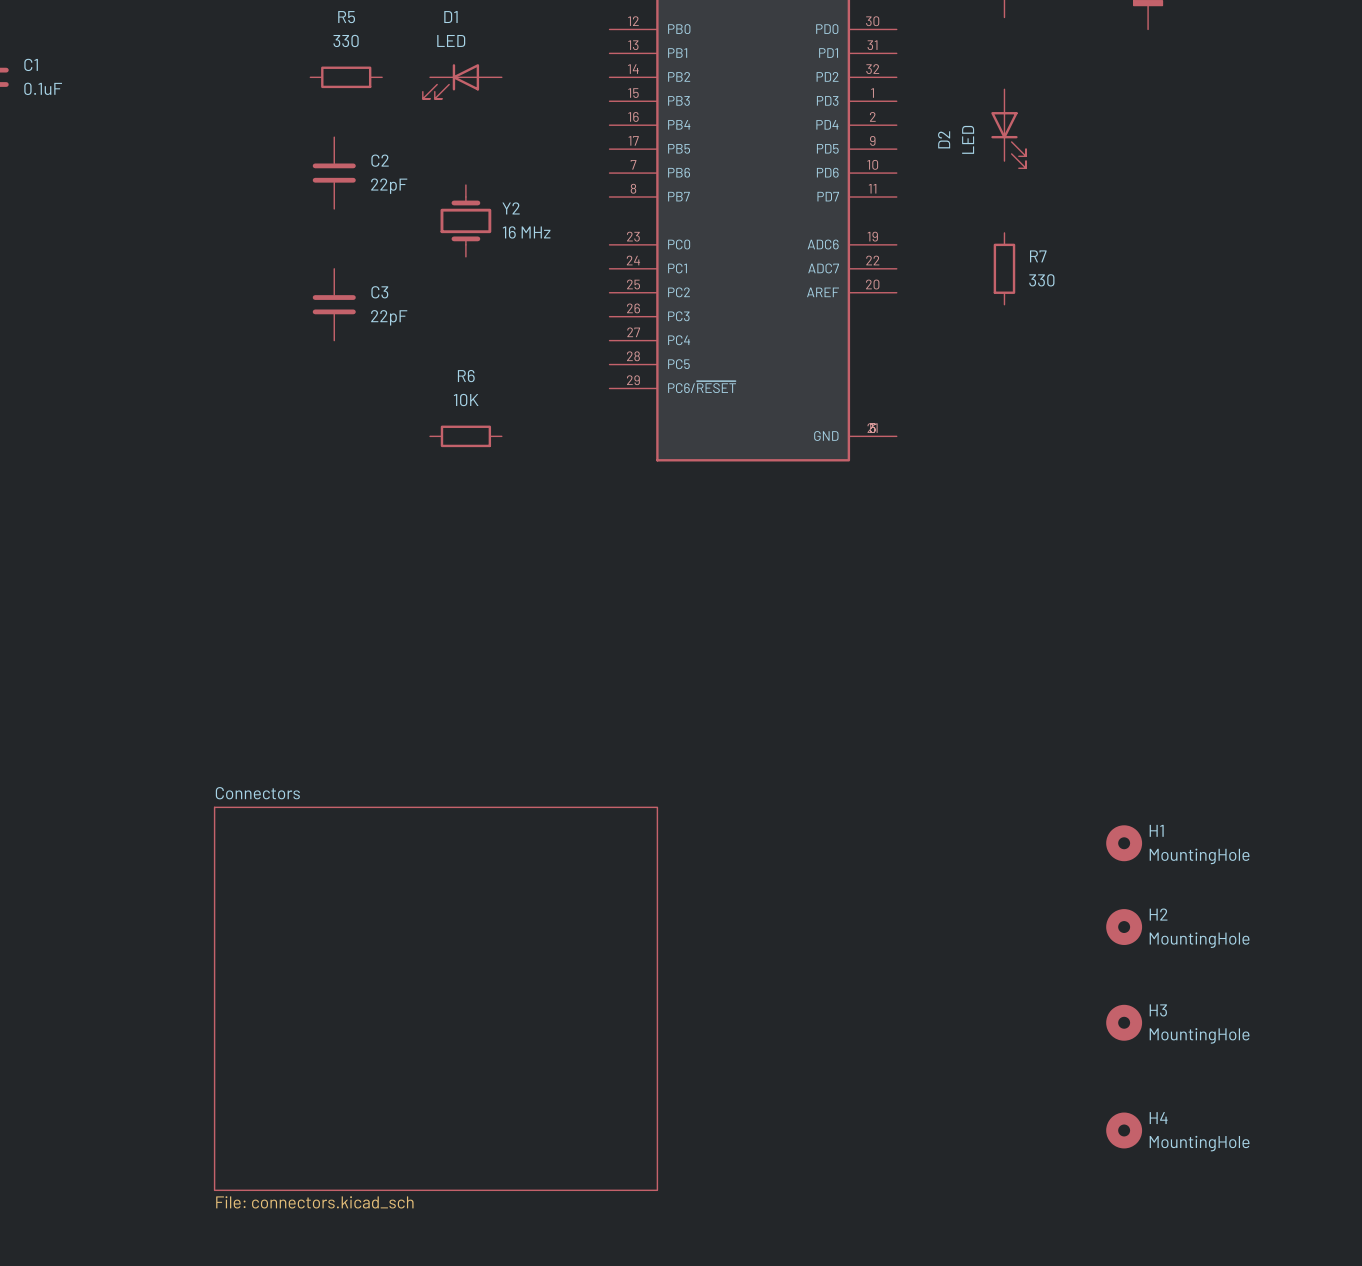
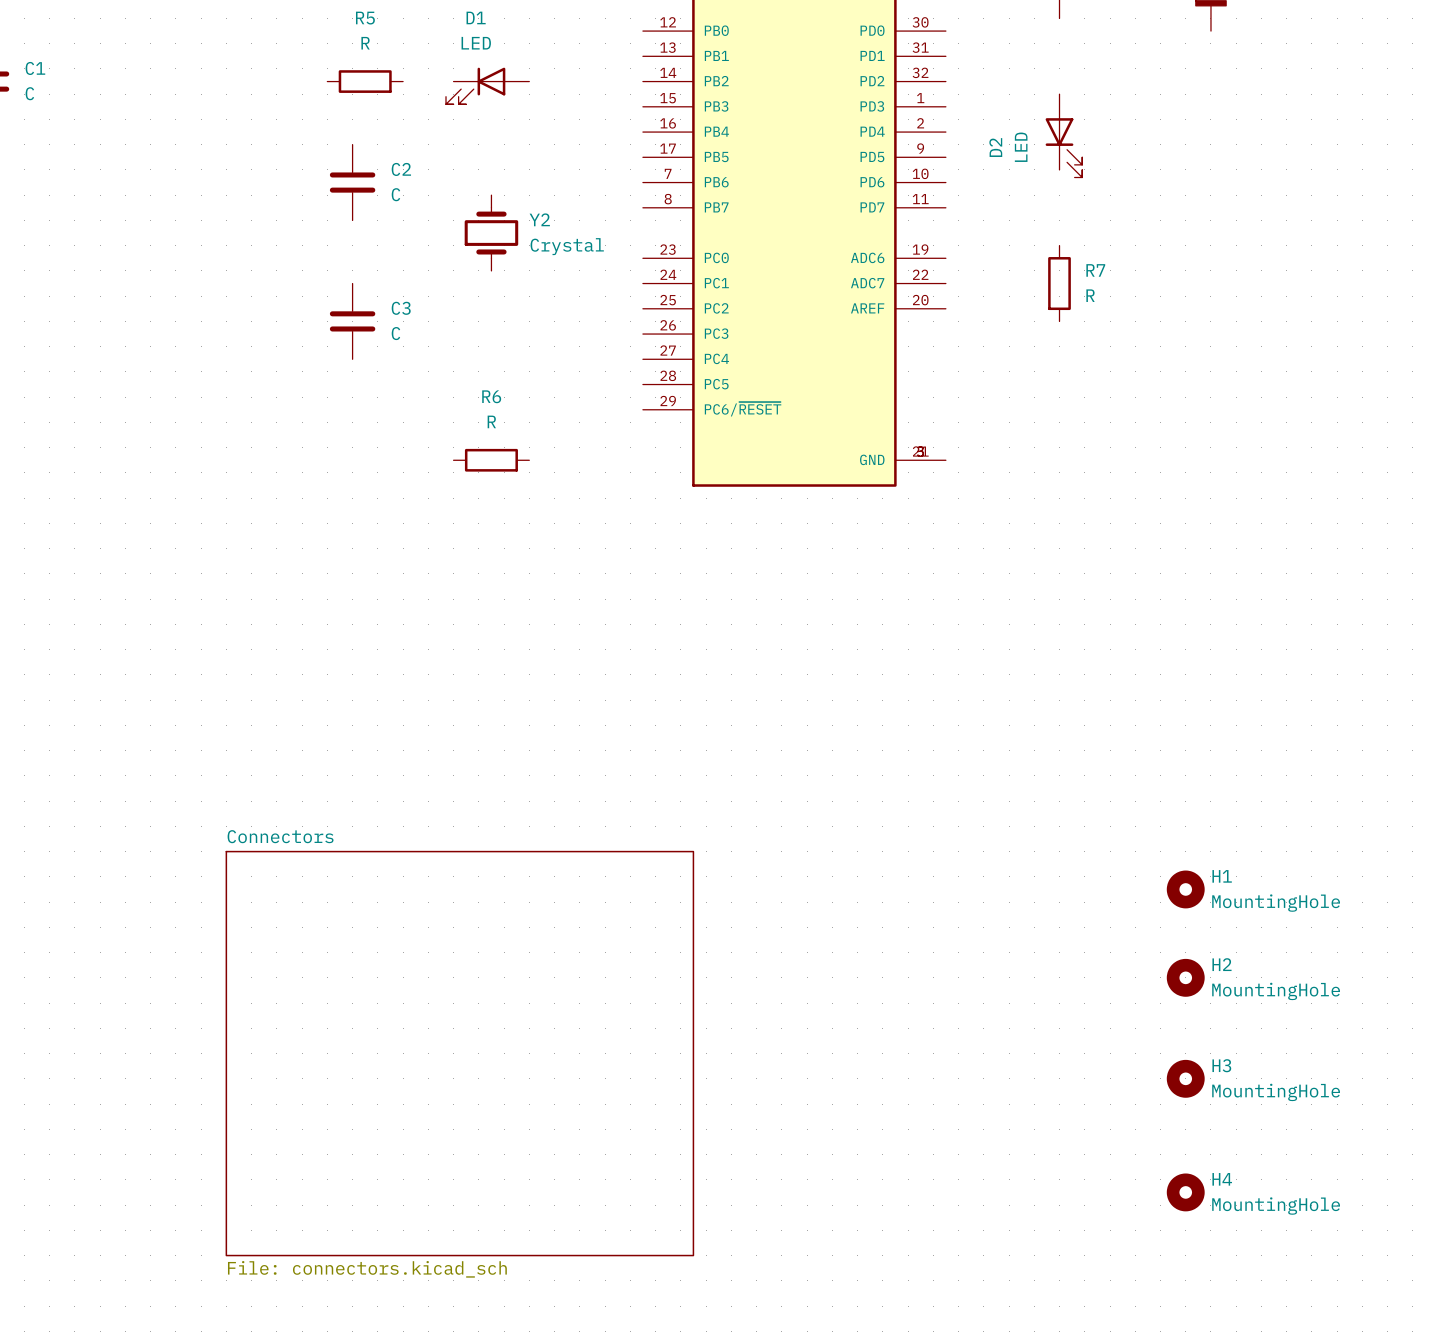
R5 value: 330 (346, 40) -> R (365, 43)
C1 value: 0.1uF (43, 88) -> C (29, 93)
C2 value: 22pF (389, 186) -> C (395, 194)
Y2 value: 16 MHz (526, 232) -> Crystal (567, 246)
R7 value: 330 (1041, 280) -> R (1090, 295)
C3 value: 22pF (389, 317) -> C (395, 333)
R6 value: 10K (466, 400) -> R (491, 421)

